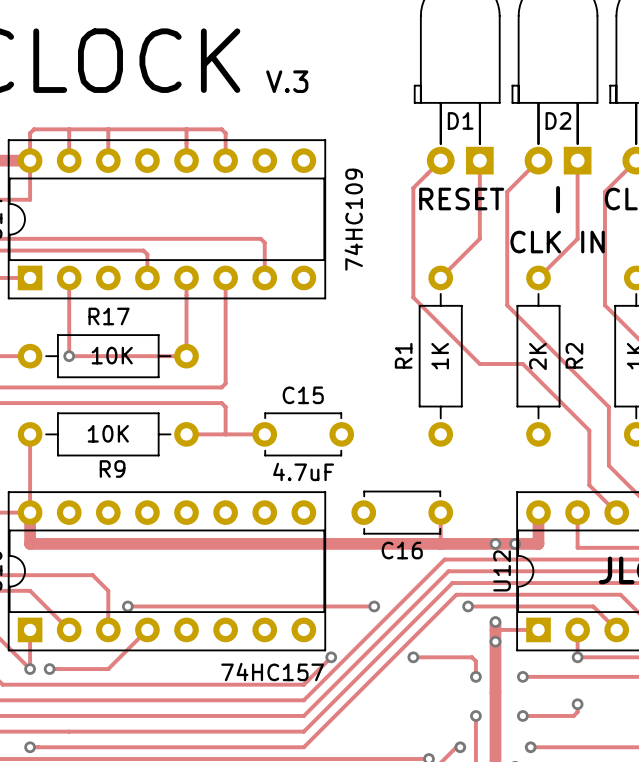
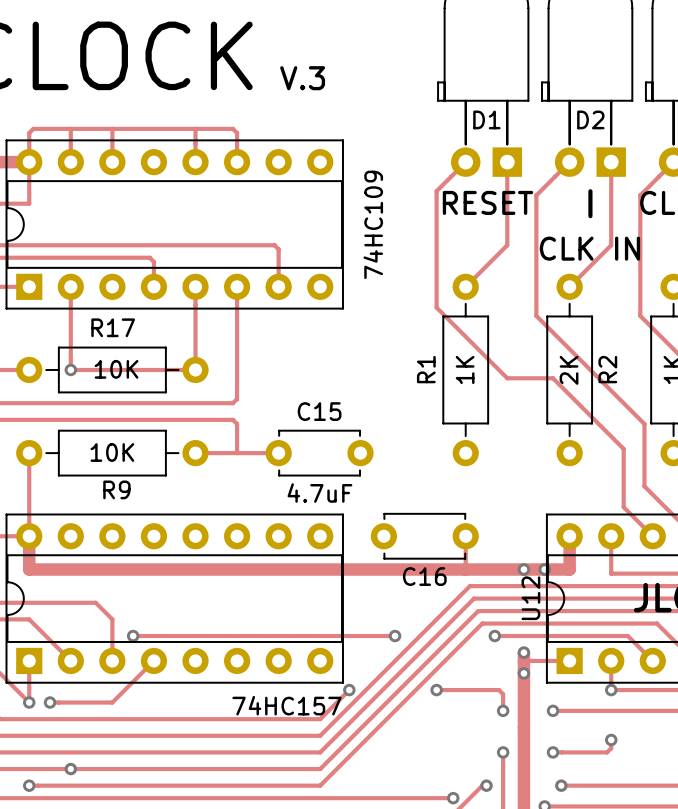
via: none -> (70, 769)

